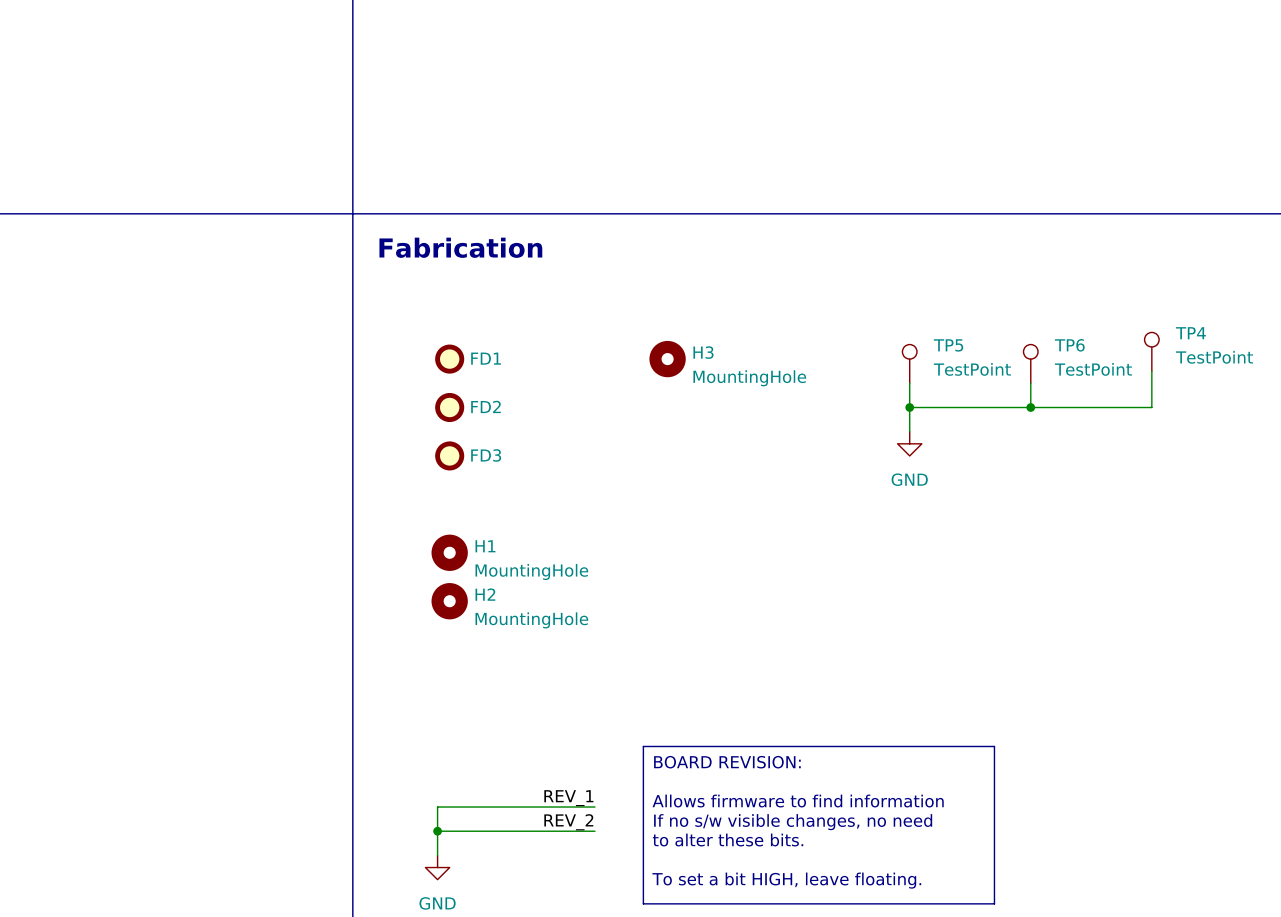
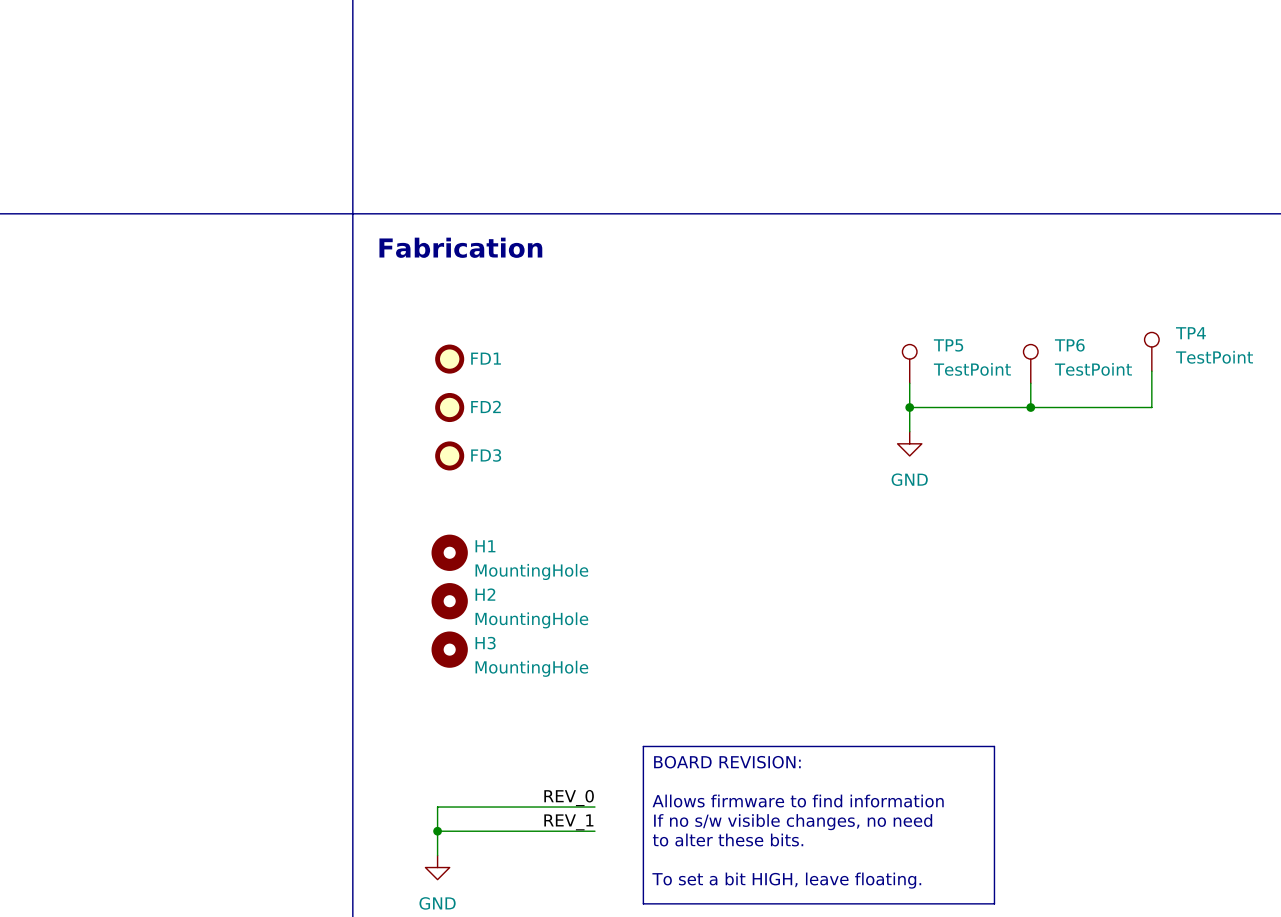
H3 position: (667, 359) -> (449, 649)
label: REV_1 (568, 798) -> REV_0 (569, 798)
label: REV_2 (568, 822) -> REV_1 (568, 822)

